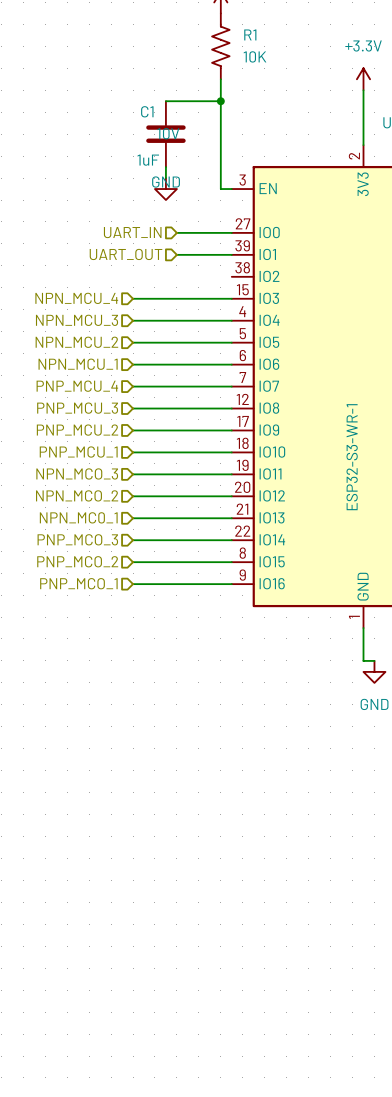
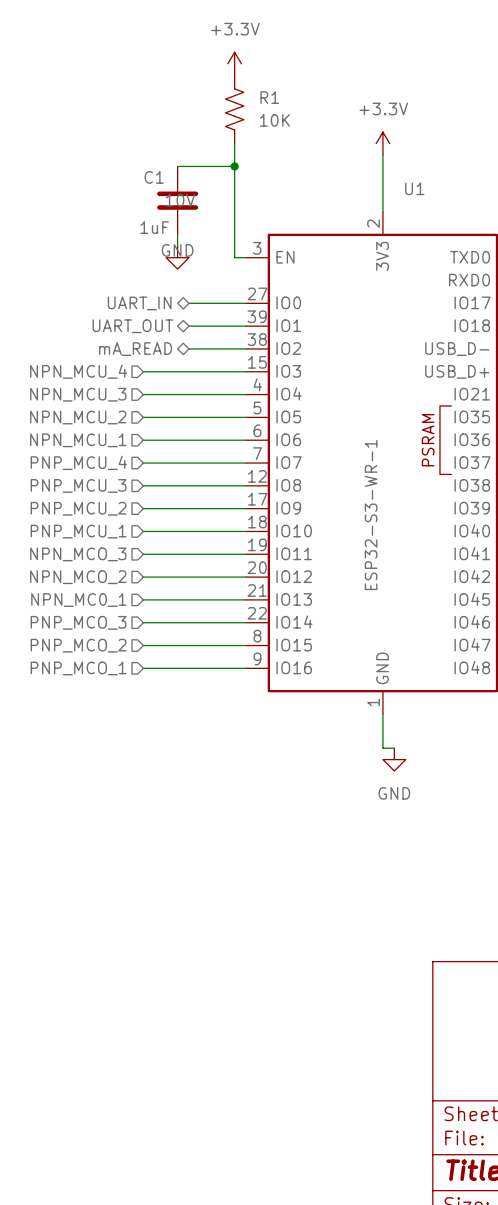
hierarchical label shape: input (132, 232) -> bidirectional (139, 303)
hierarchical label shape: input (126, 254) -> bidirectional (132, 326)
hierarchical label: none -> mA_READ (135, 349)
wire: none -> (189, 348) (246, 348)

